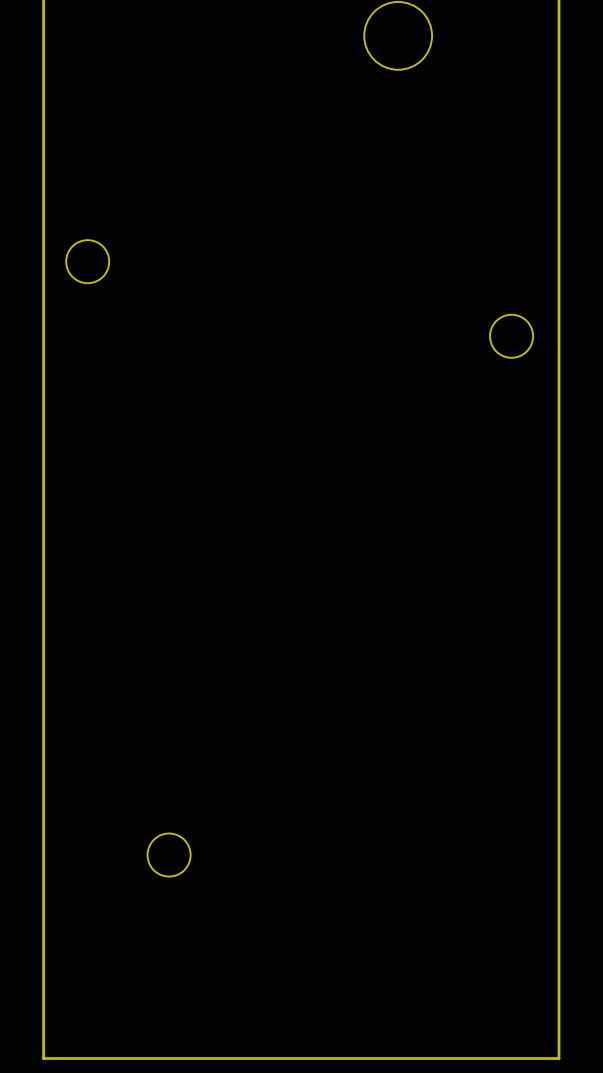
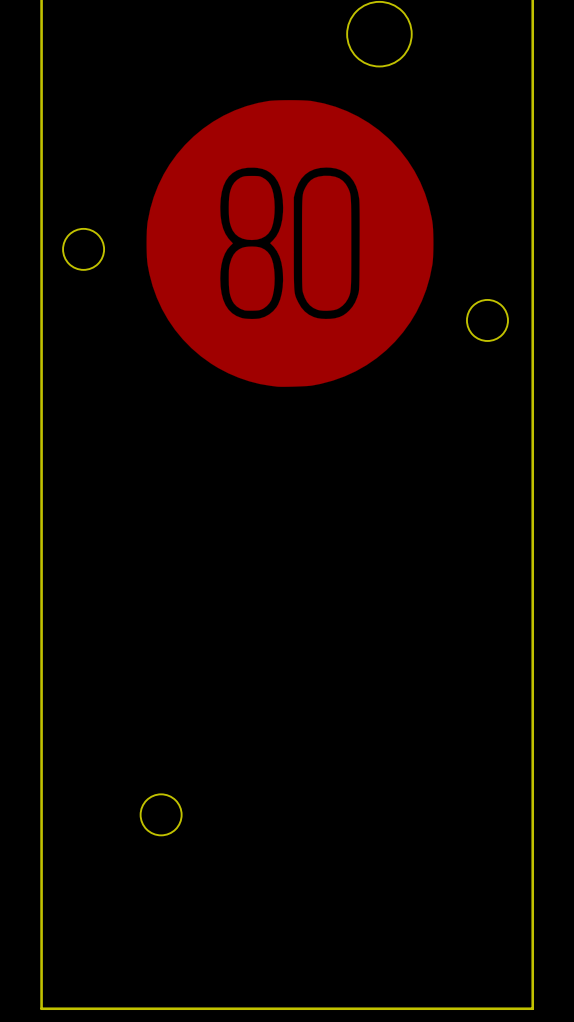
drawing: none -> [146, 100, 434, 387]

